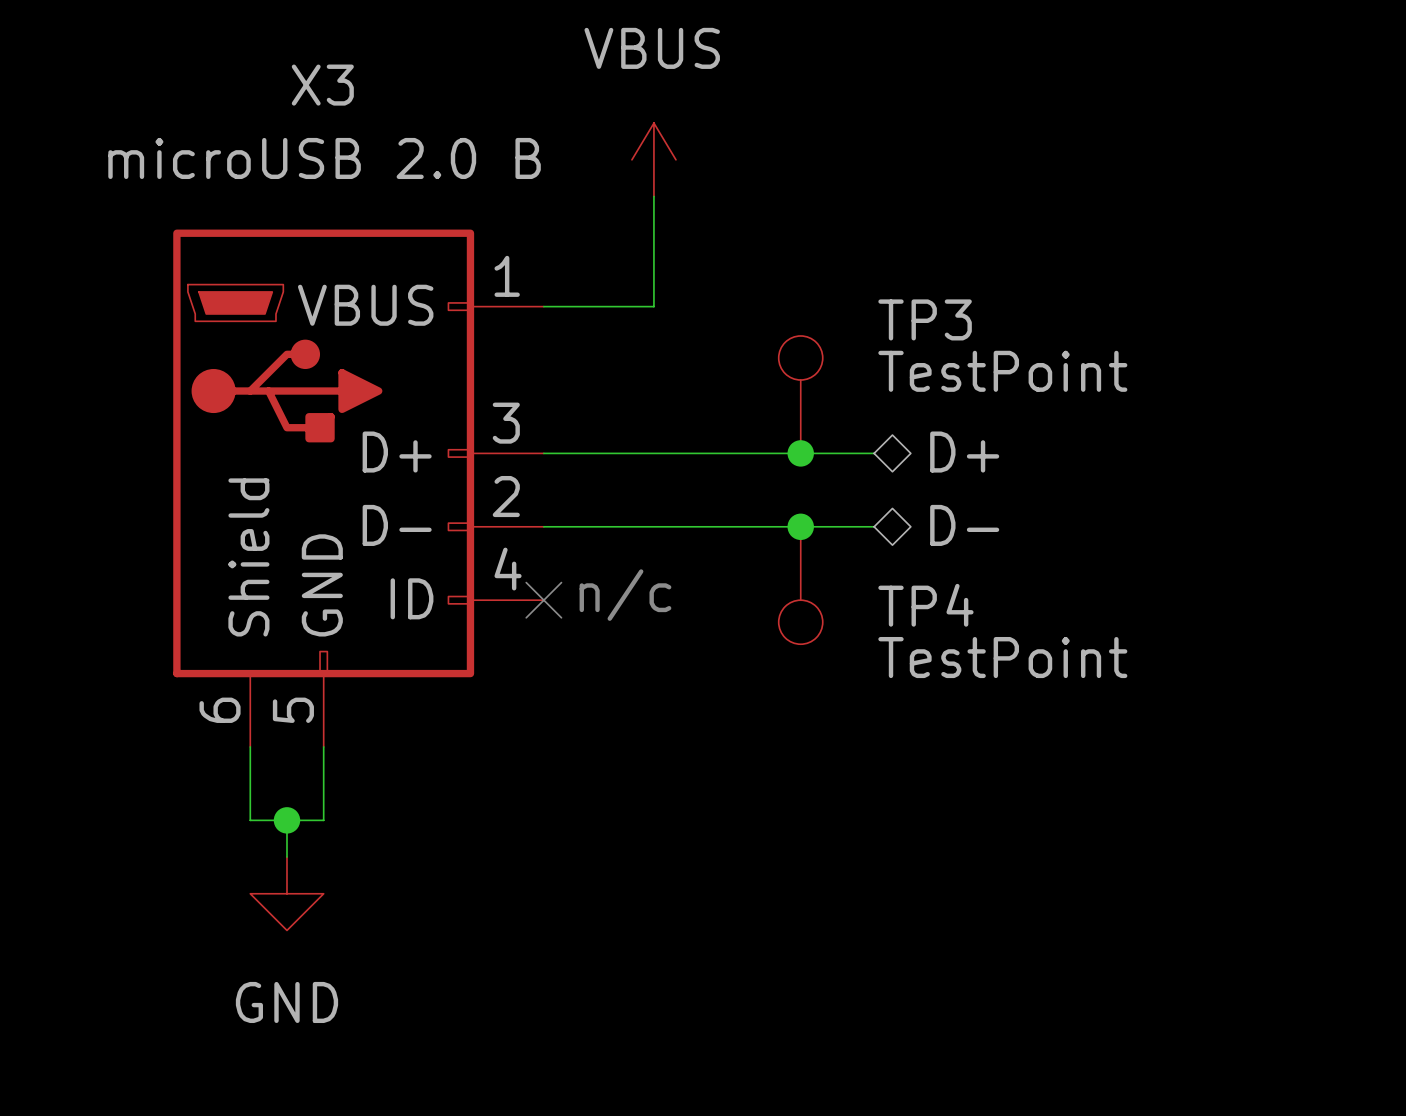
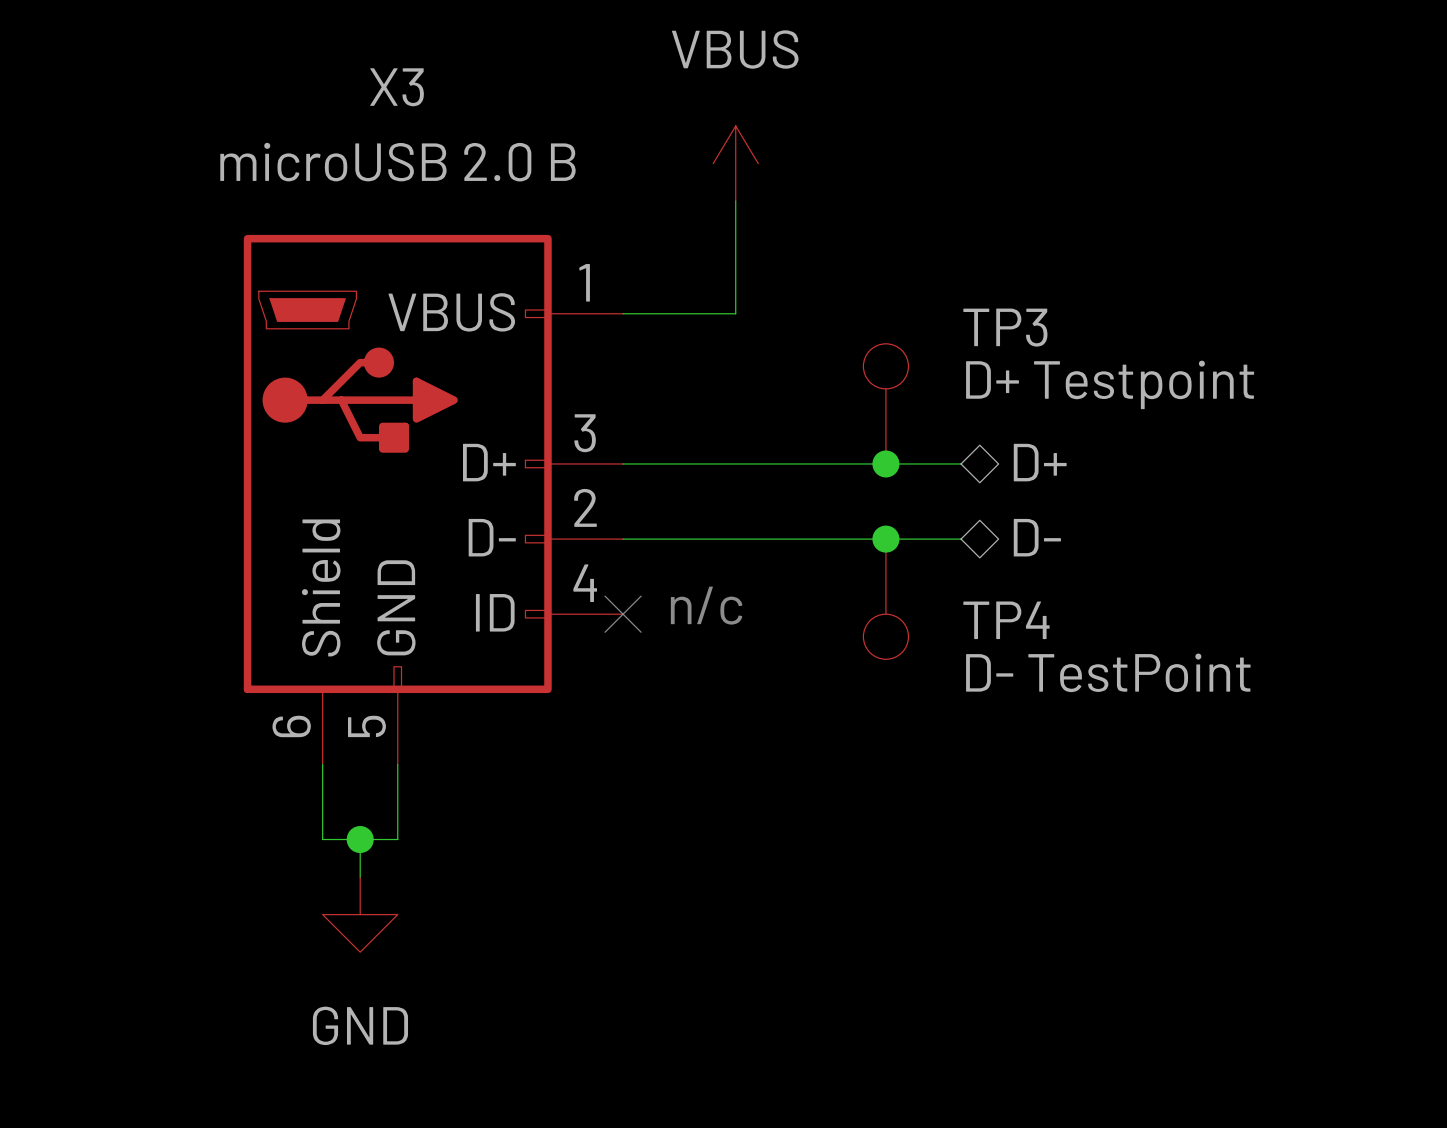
TP3 value: TestPoint (1002, 371) -> D+ Testpoint (1110, 384)
TP4 value: TestPoint (1002, 657) -> D- TestPoint (1108, 672)

